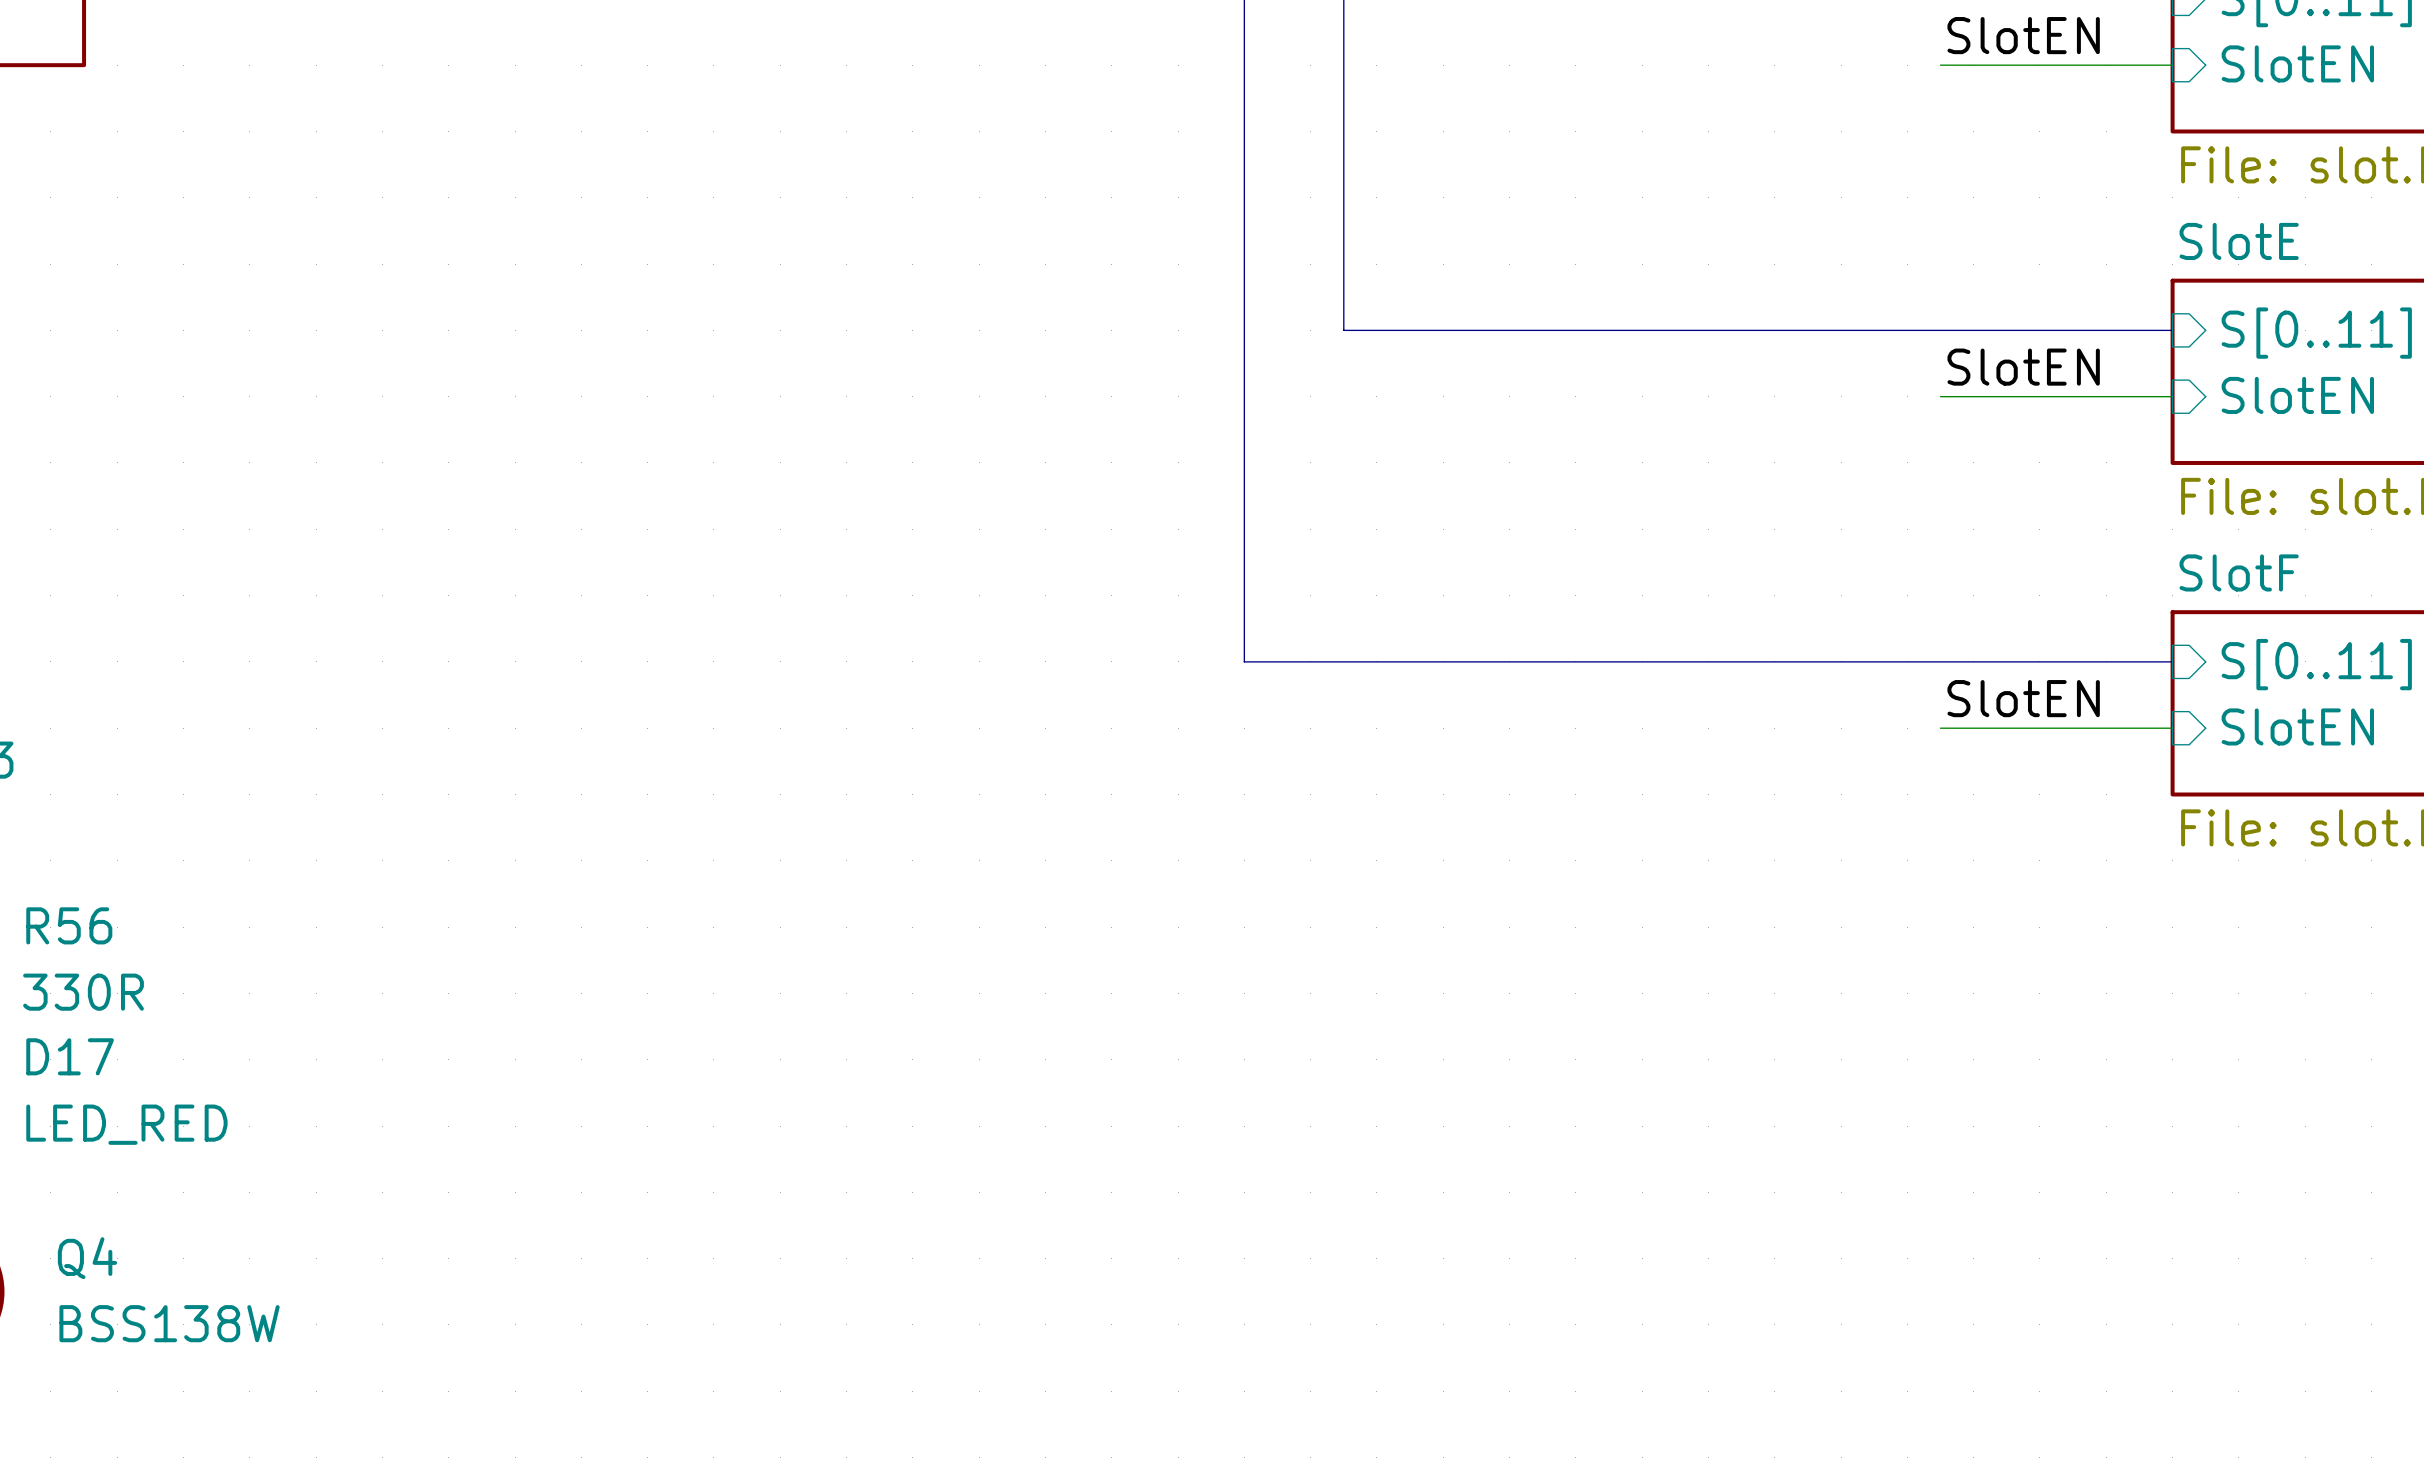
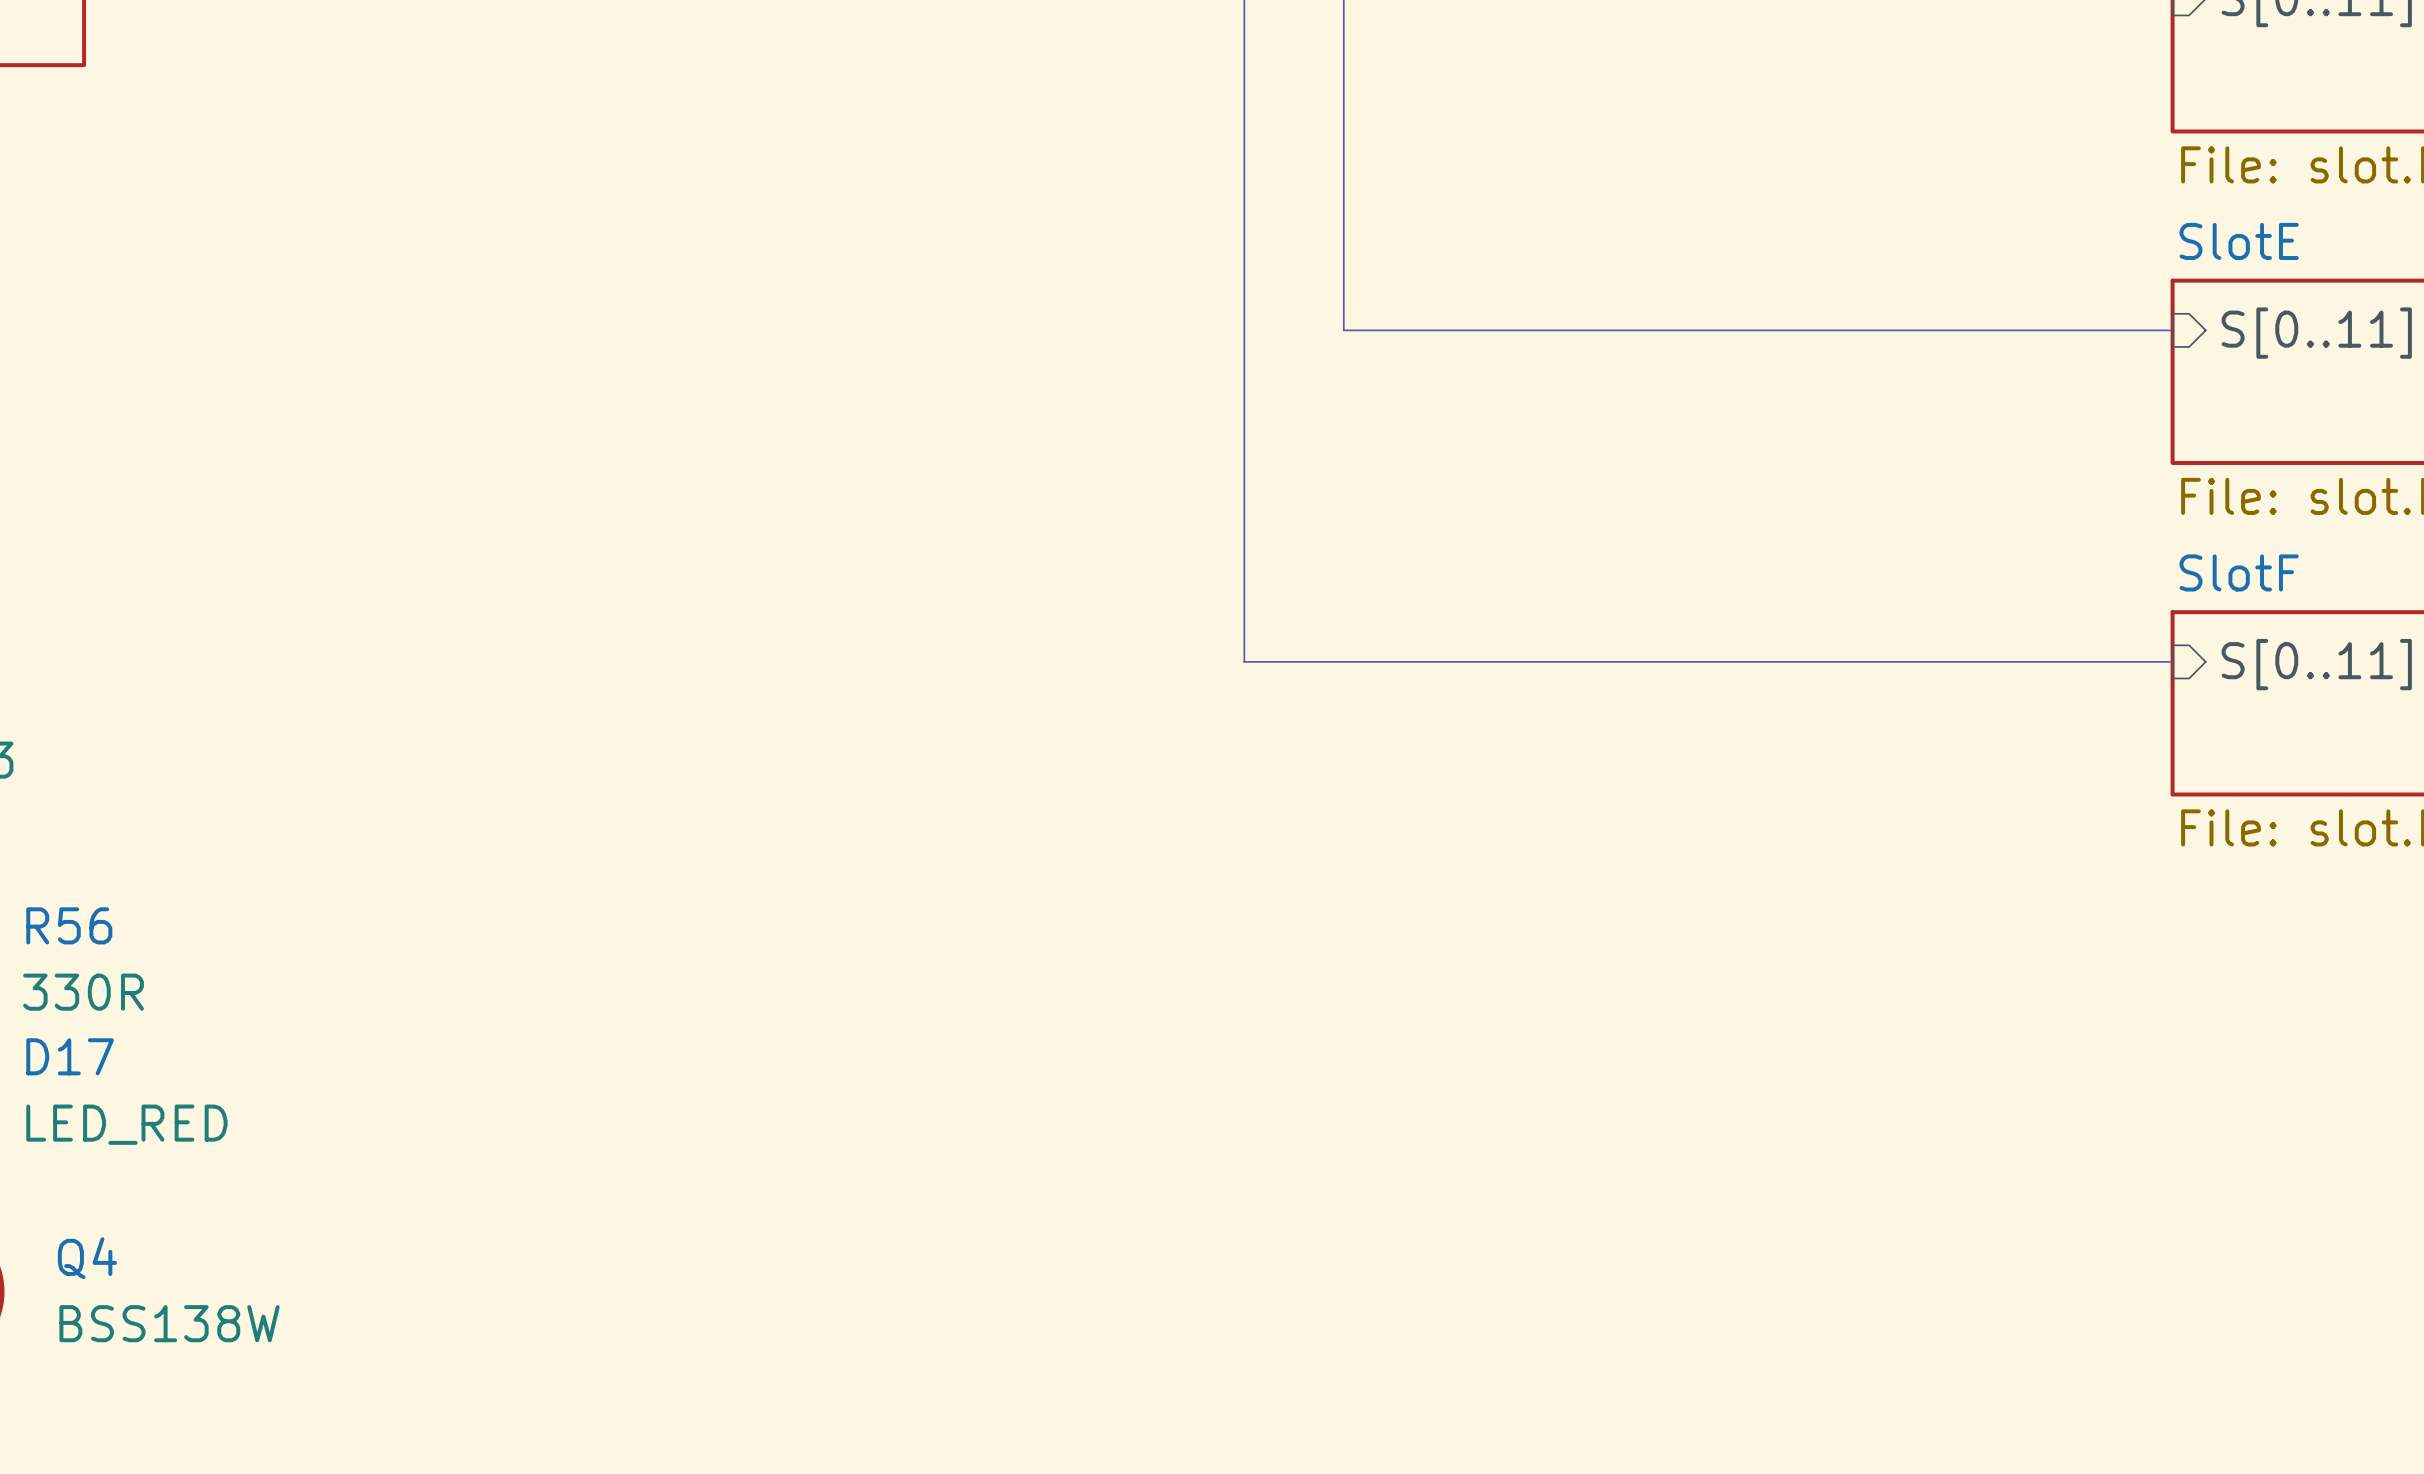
label: SlotEN (2023, 35) -> none
sheet pin: SlotEN (2297, 63) -> none
wire: (1940, 65) (2172, 65) -> none
label: SlotEN (2023, 367) -> none
sheet pin: SlotEN (2297, 395) -> none
wire: (1940, 396) (2172, 396) -> none
label: SlotEN (2023, 698) -> none
sheet pin: SlotEN (2297, 726) -> none
wire: (1940, 728) (2172, 728) -> none

